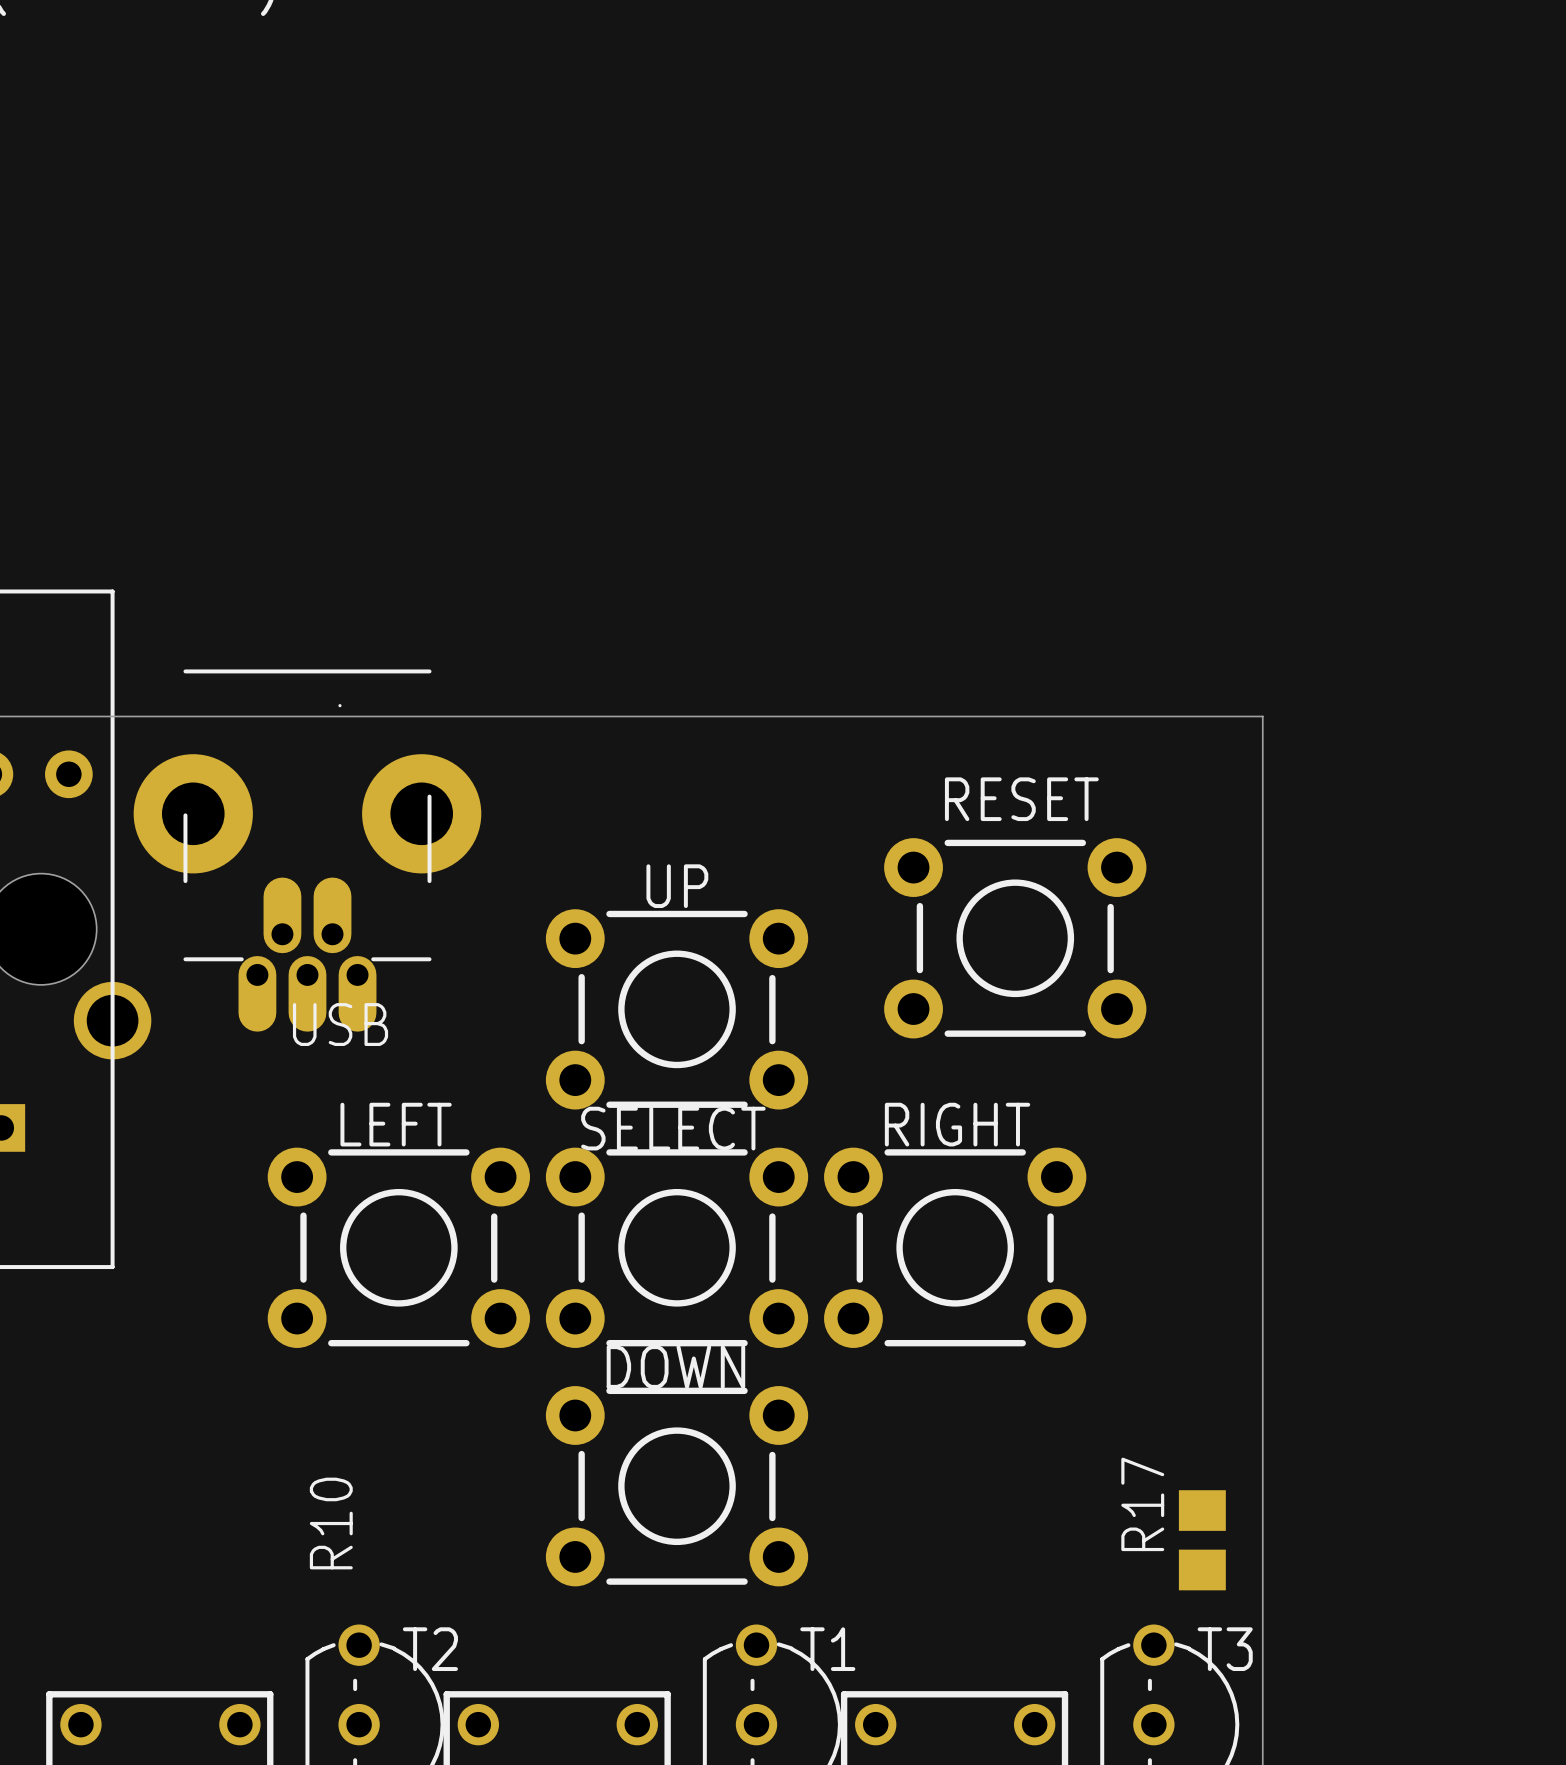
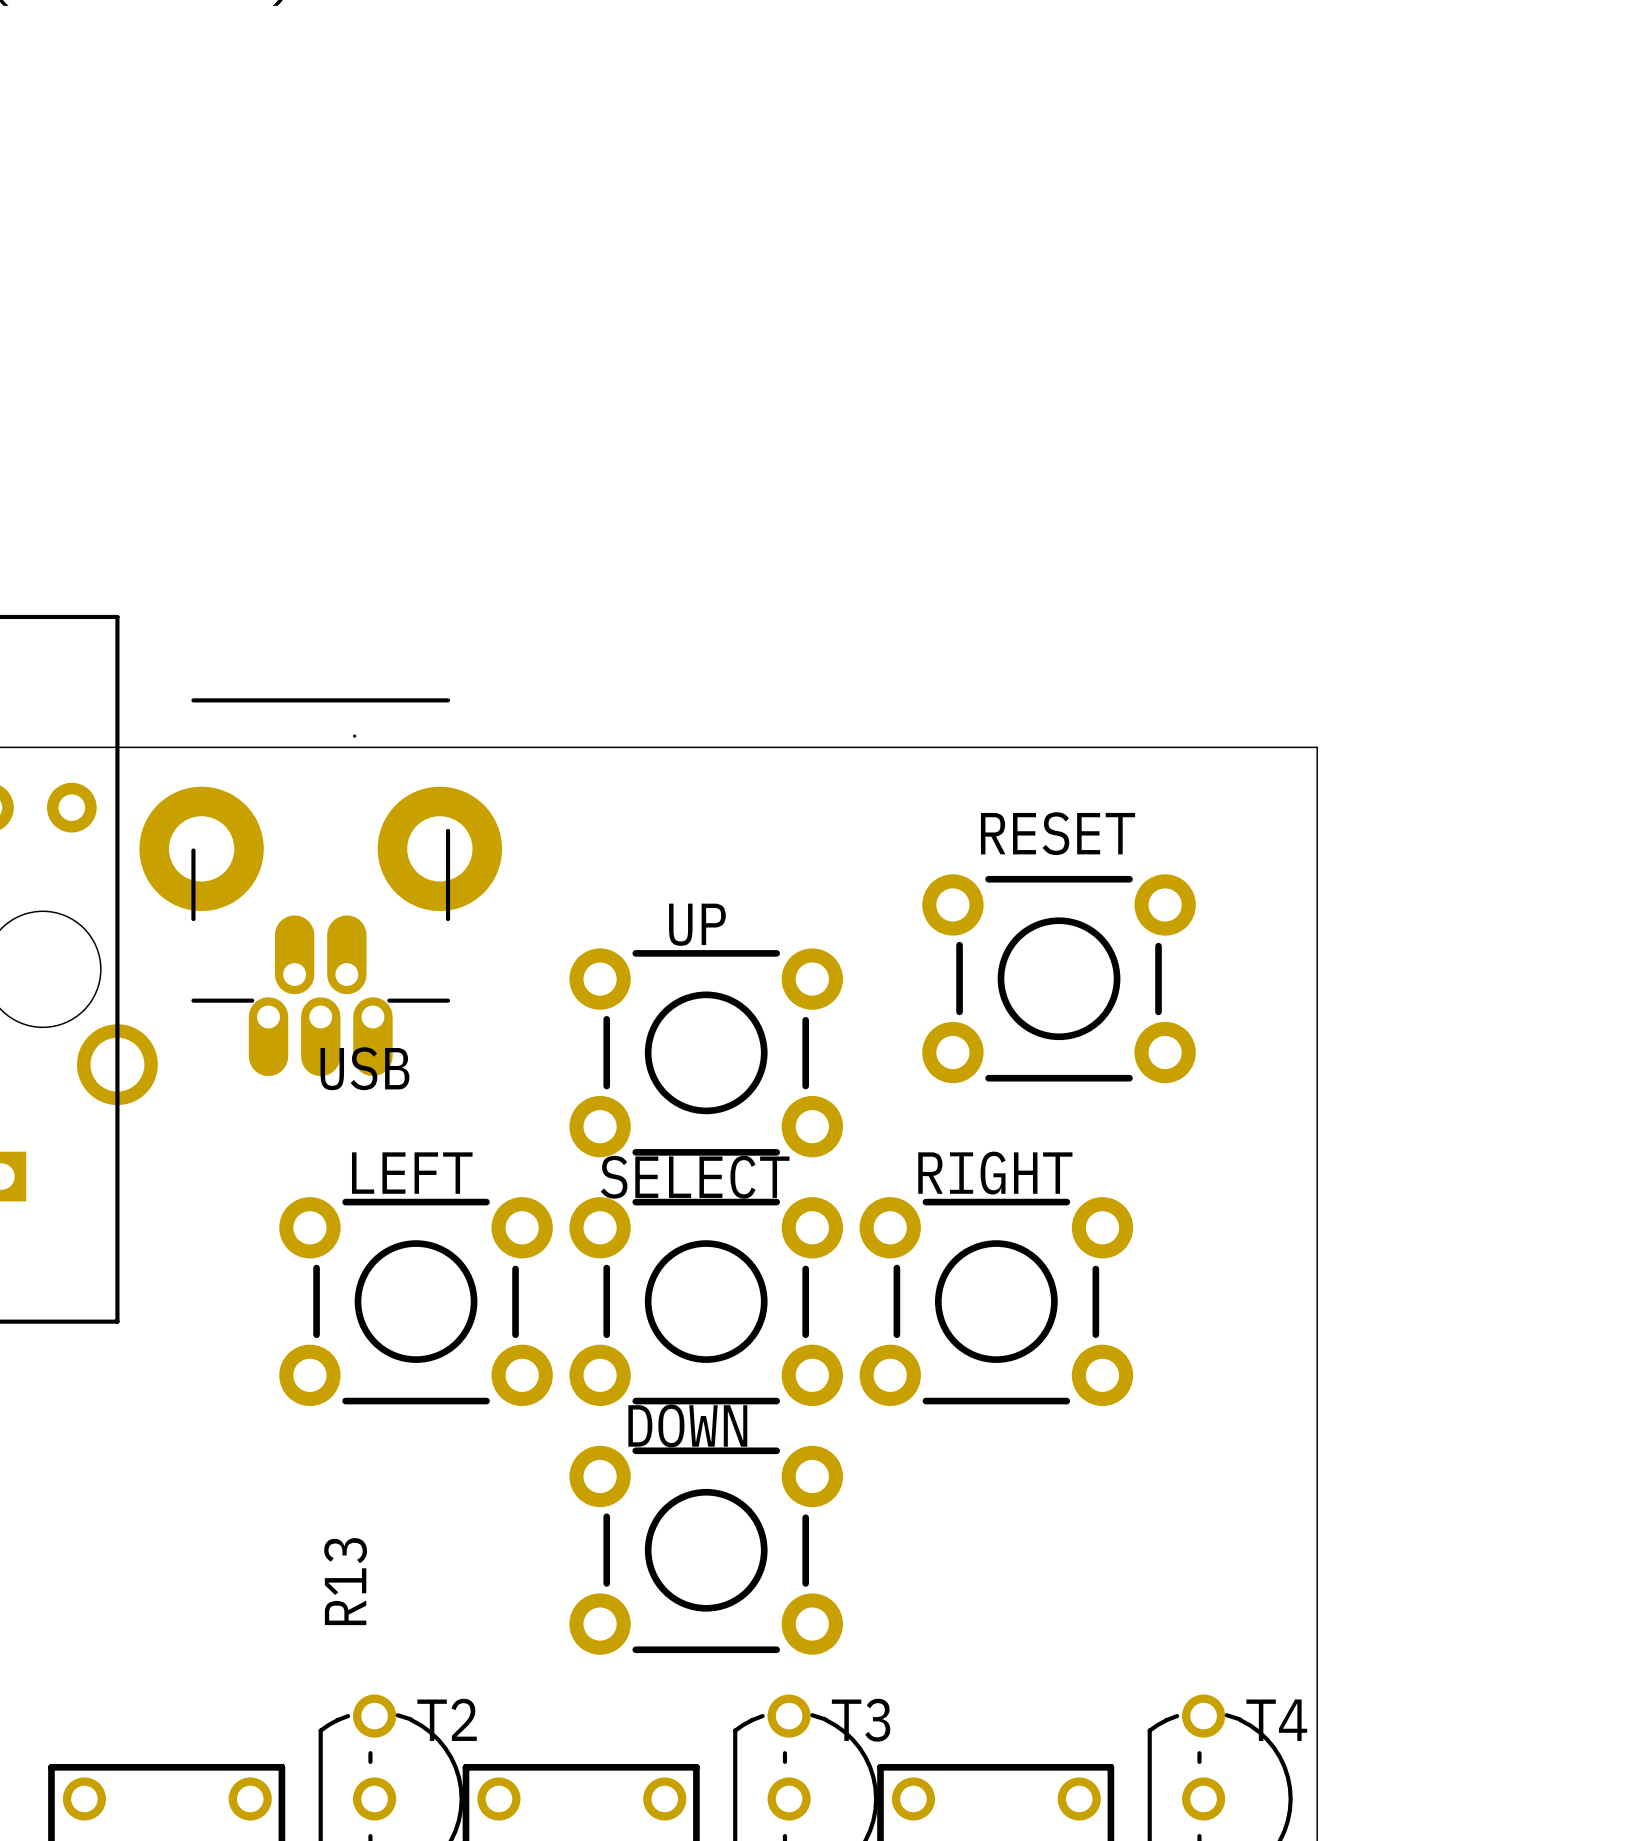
R10 name: R10 (331, 1523) -> R13 (345, 1581)
R17: (1202, 1540) -> none
T1 name: T1 (827, 1649) -> T3 (861, 1720)
T3 name: T3 (1225, 1649) -> T4 (1276, 1720)

